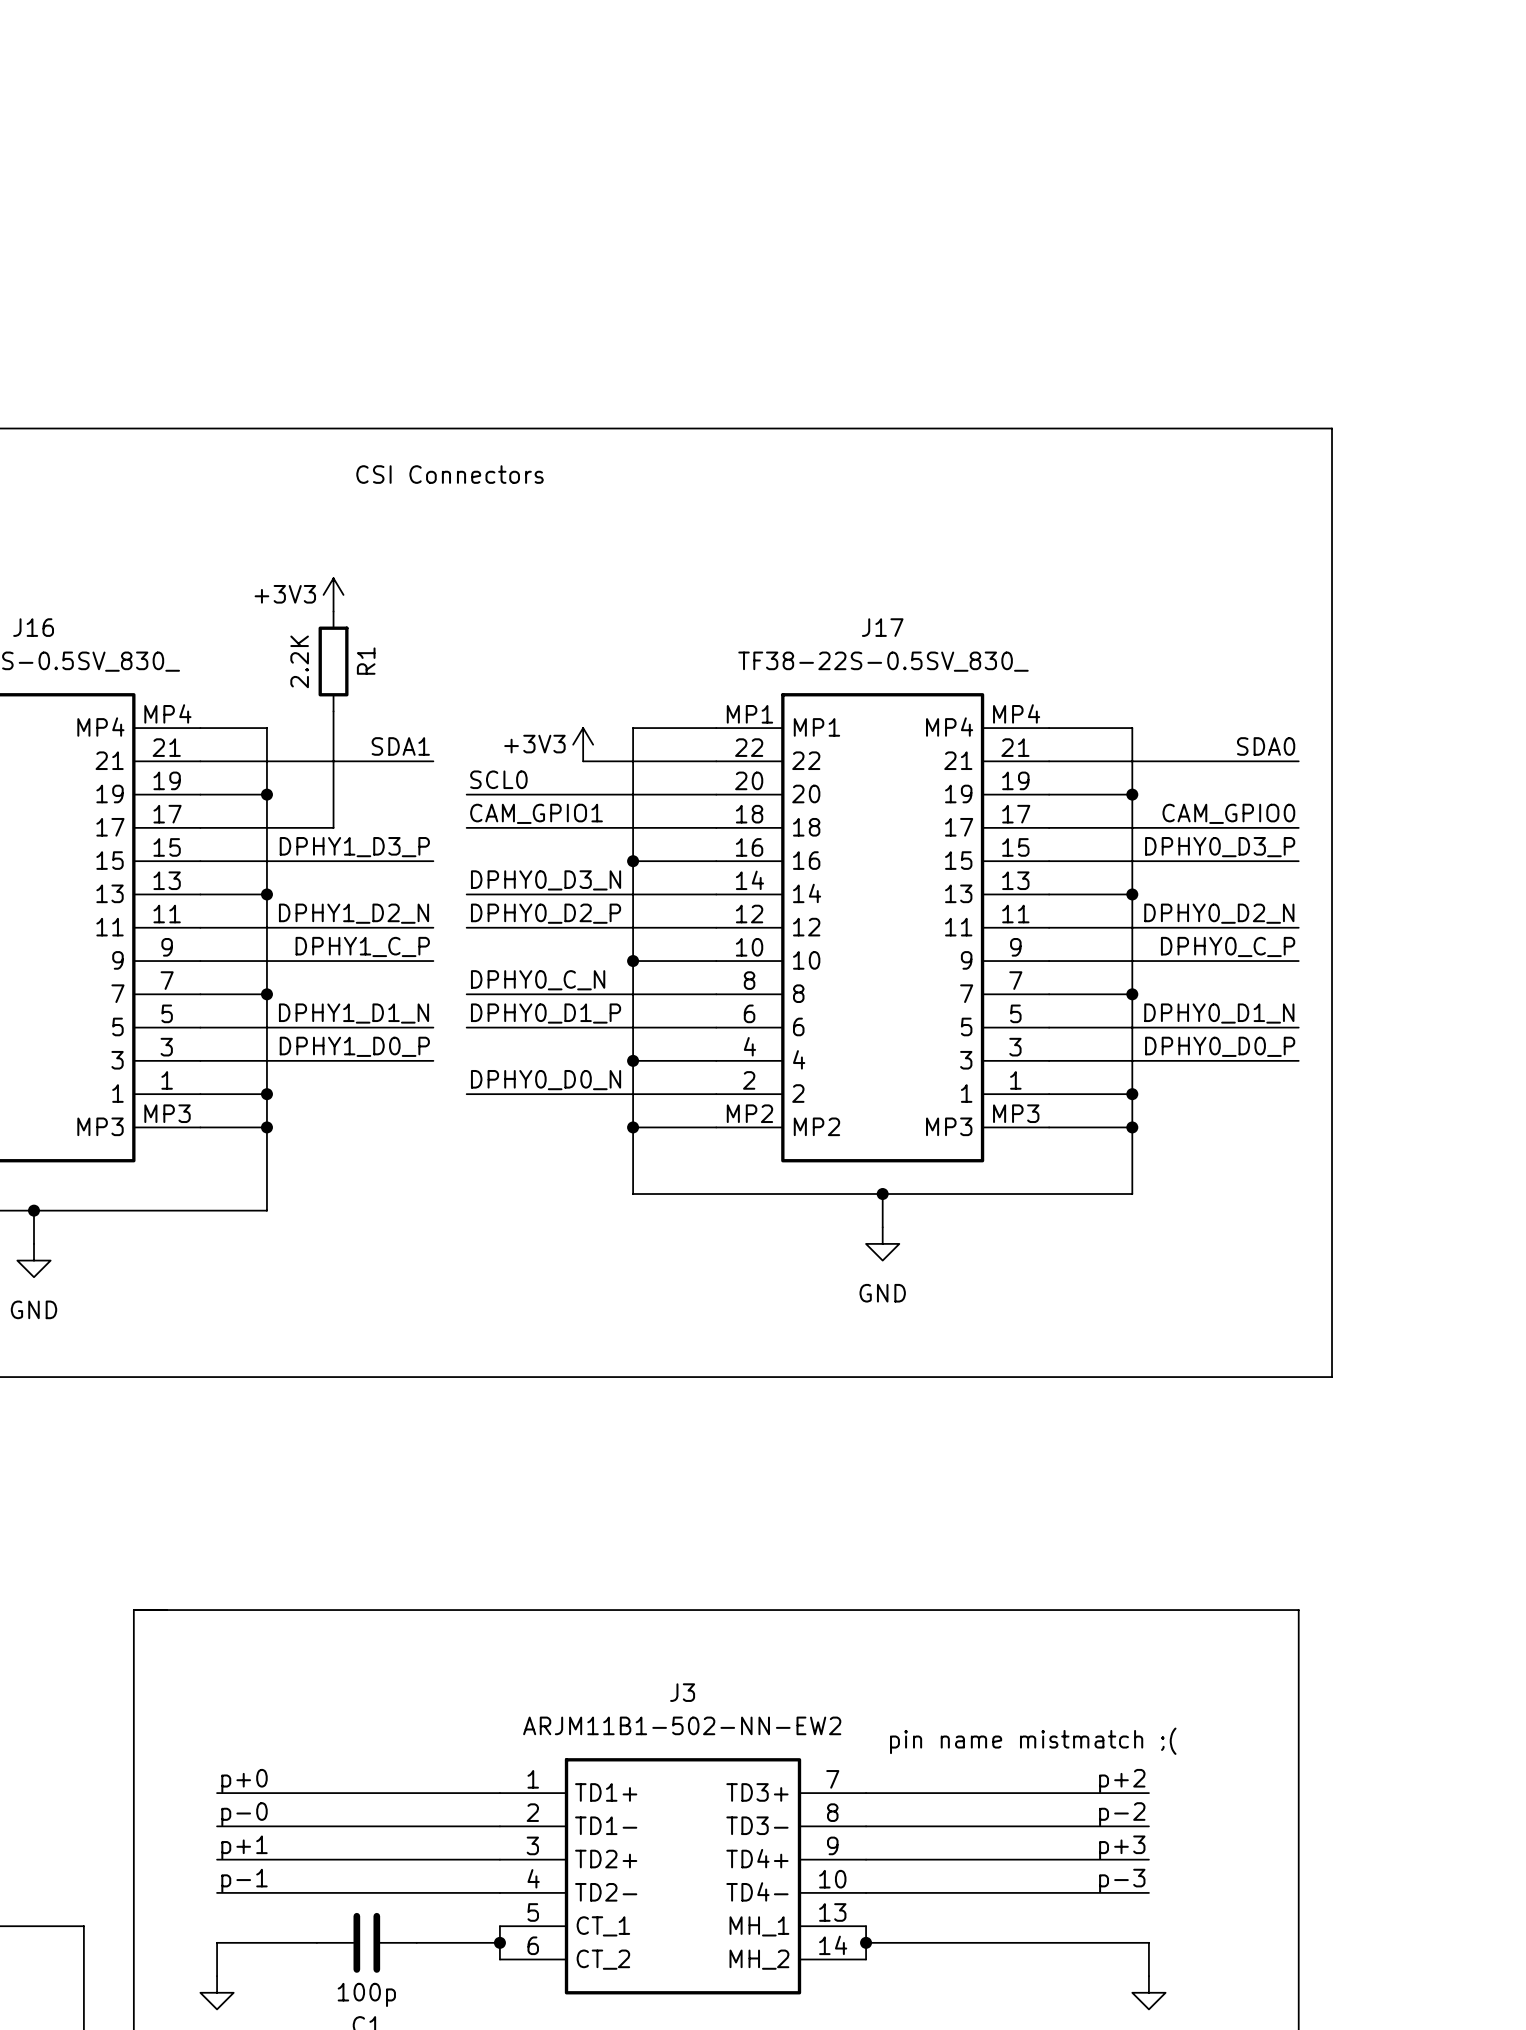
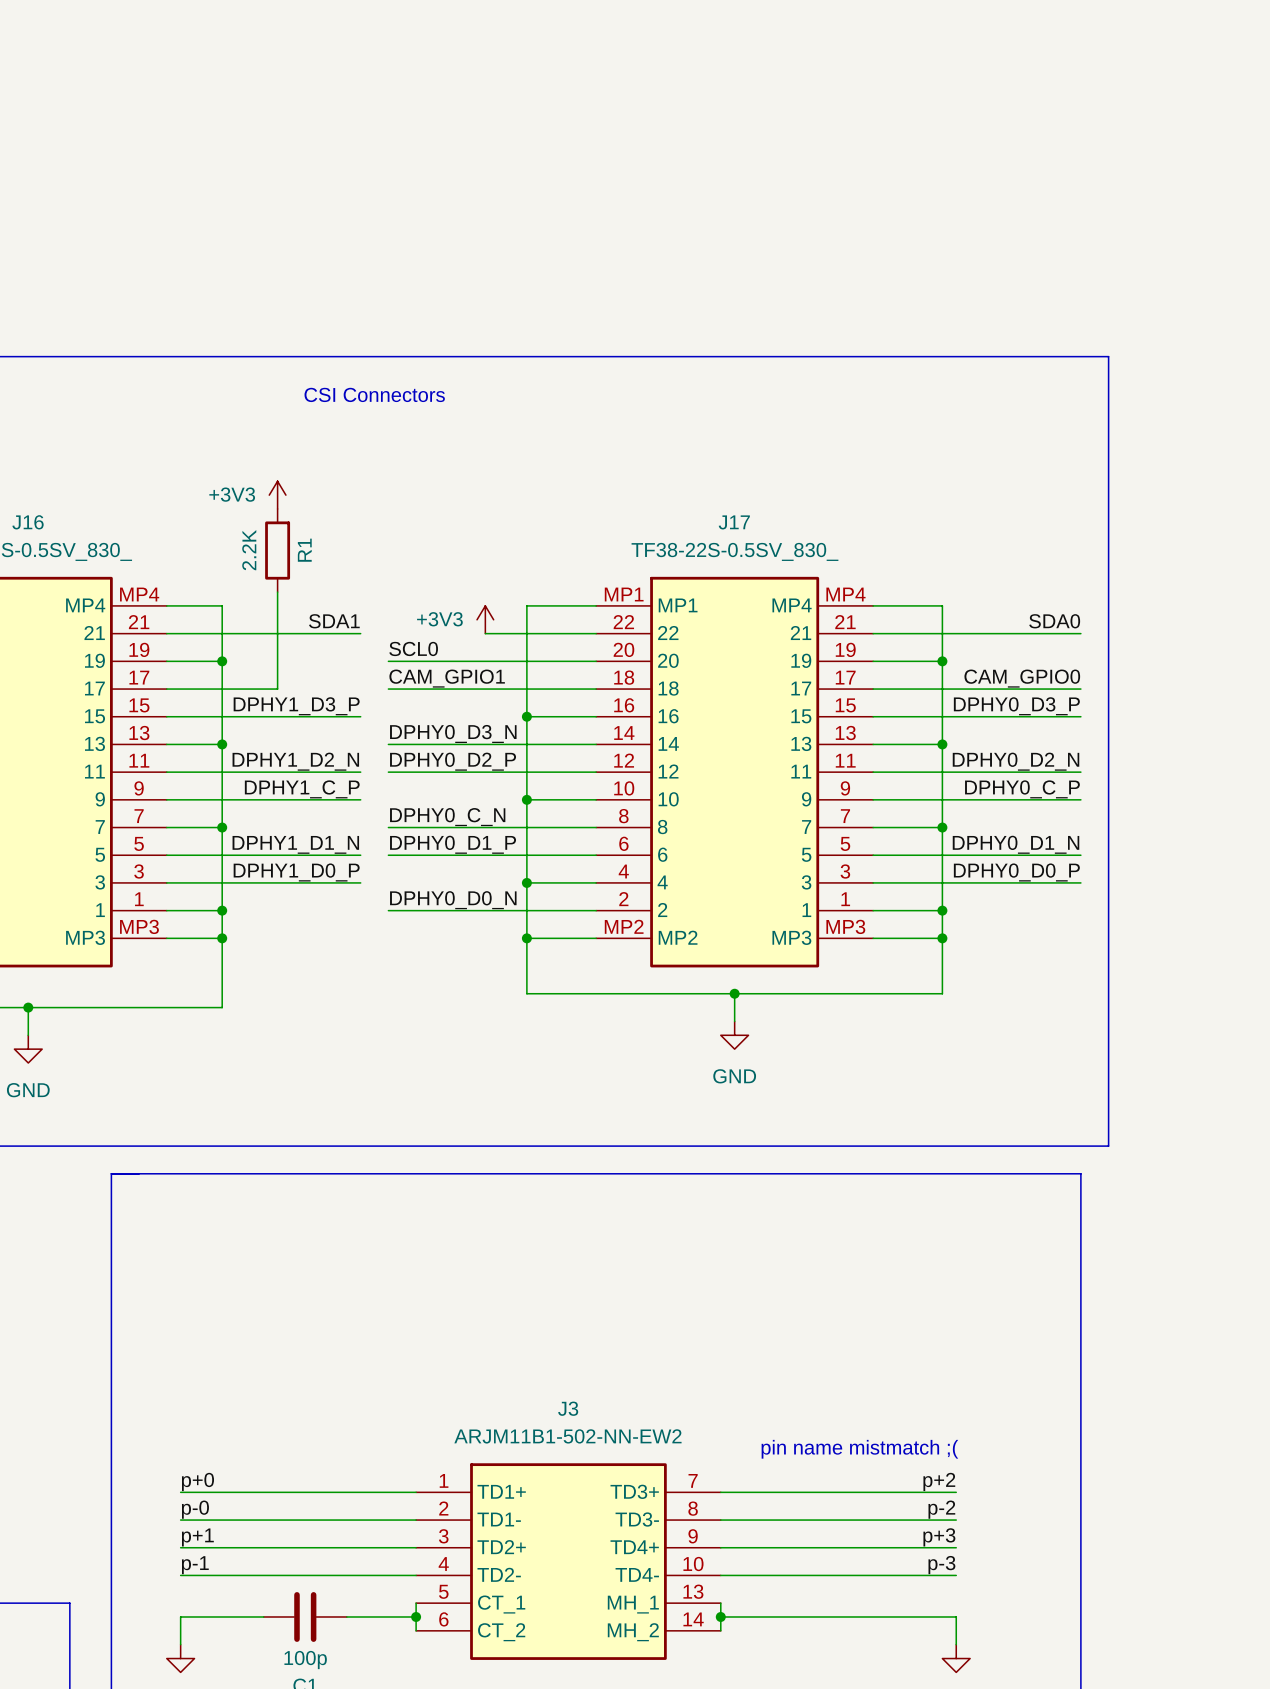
line: (133, 1610) (1298, 1610) -> (111, 1339) (111, 1173) (1080, 1173) (1080, 1339)

